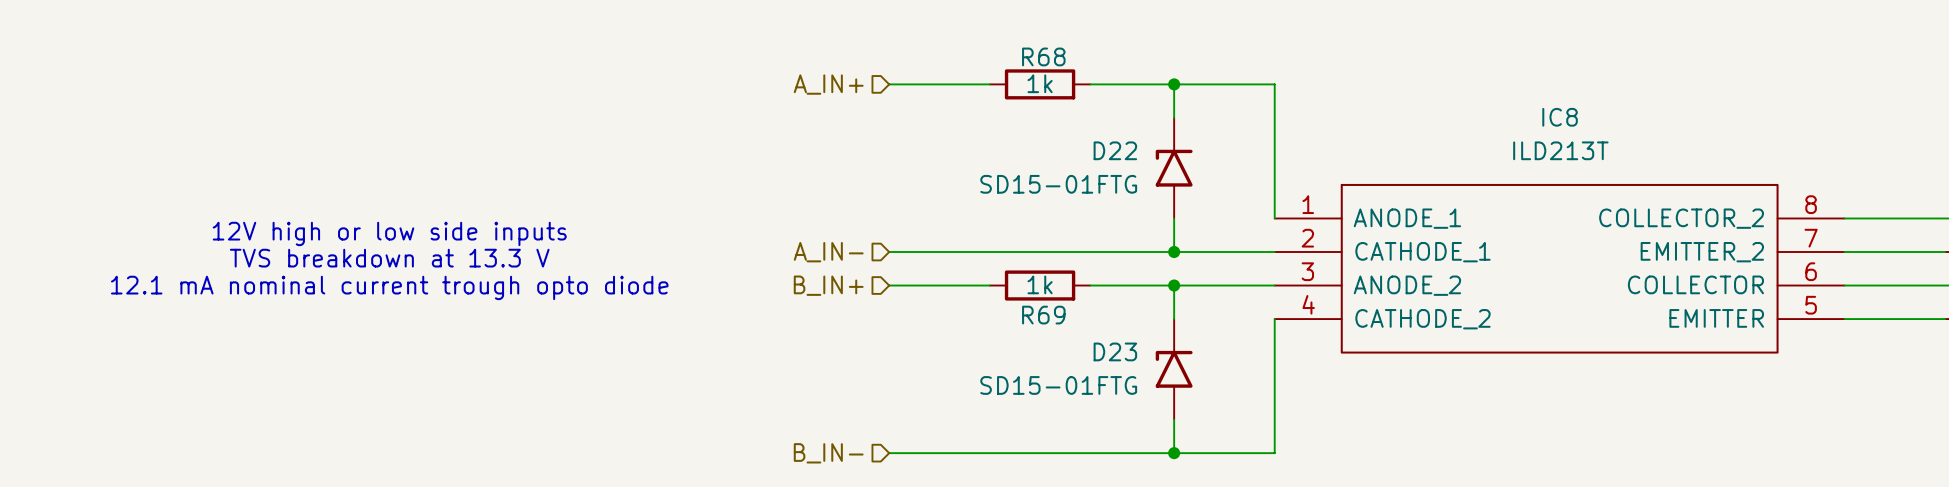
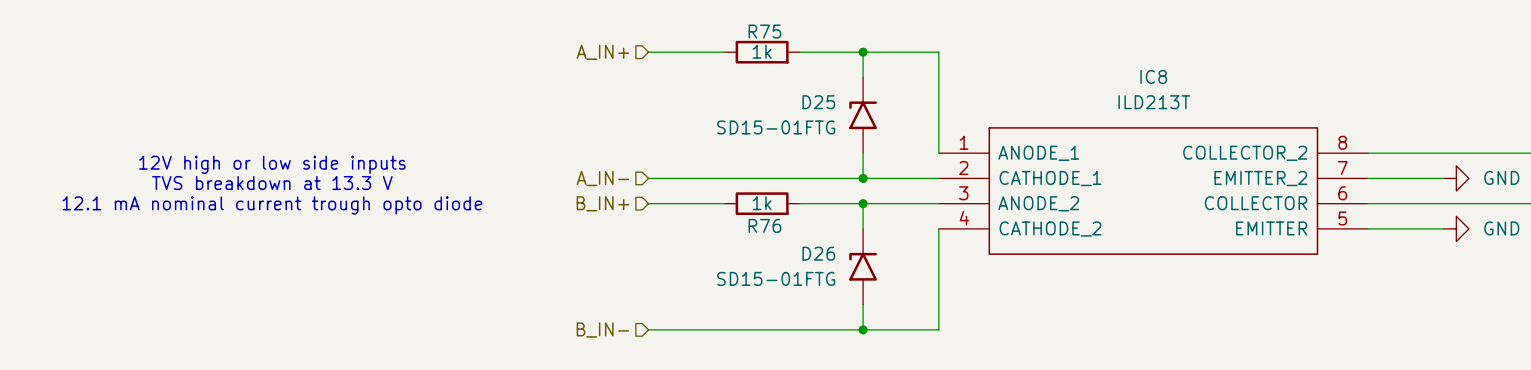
R68 name: R68 (1043, 56) -> R75 (764, 31)
D22 name: D22 (1115, 150) -> D25 (818, 102)
R69 name: R69 (1043, 315) -> R76 (764, 225)
D23 name: D23 (1115, 351) -> D26 (818, 253)

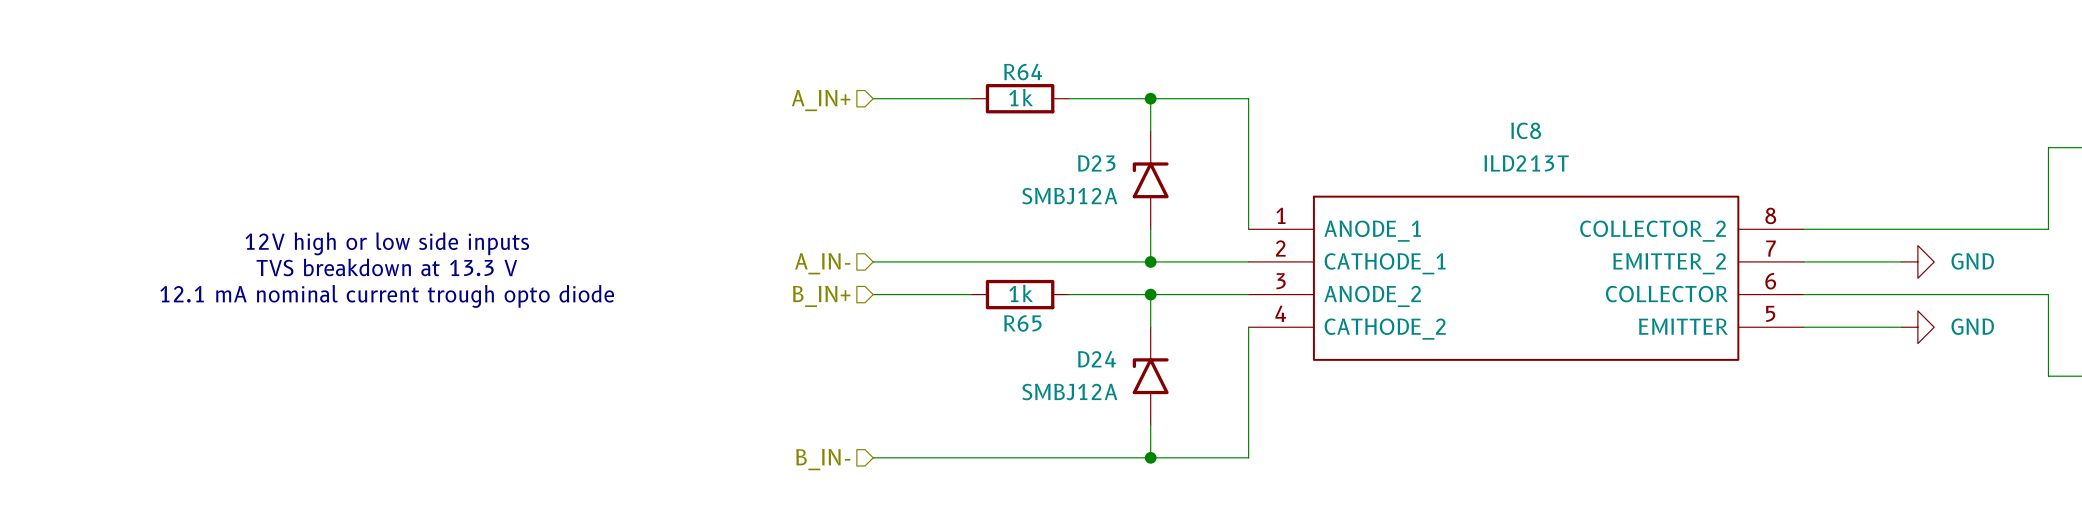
R75 name: R75 (764, 31) -> R64 (1023, 72)
D25 name: D25 (818, 102) -> D23 (1096, 163)
D25 value: SD15-01FTG (776, 127) -> SMBJ12A (1069, 196)
R76 name: R76 (764, 225) -> R65 (1022, 323)
D26 name: D26 (818, 253) -> D24 (1096, 359)
D26 value: SD15-01FTG (776, 278) -> SMBJ12A (1069, 392)

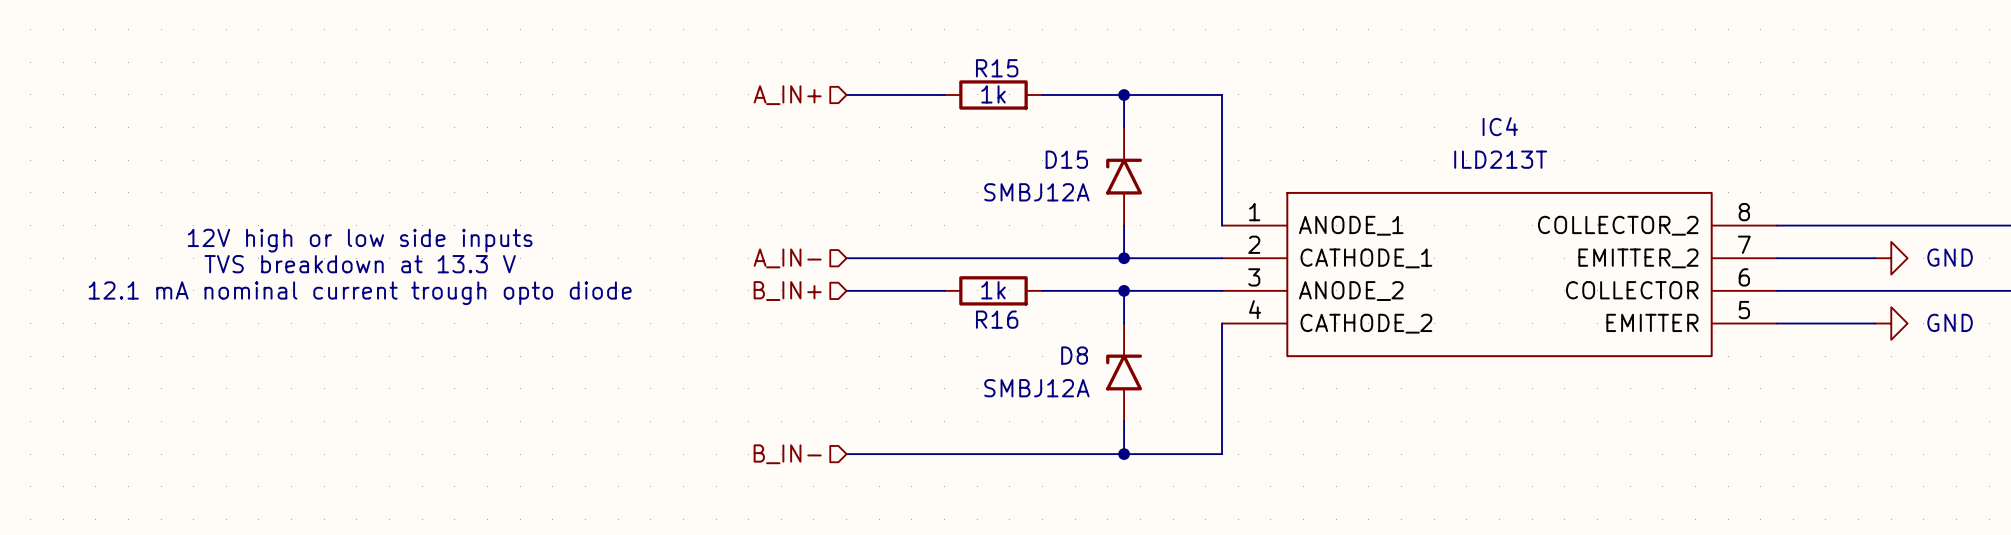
R64 name: R64 (1023, 72) -> R15 (997, 68)
IC8 name: IC8 (1526, 130) -> IC4 (1500, 126)
D23 name: D23 (1096, 163) -> D15 (1066, 159)
R65 name: R65 (1022, 323) -> R16 (997, 319)
D24 name: D24 (1096, 359) -> D8 (1074, 355)

